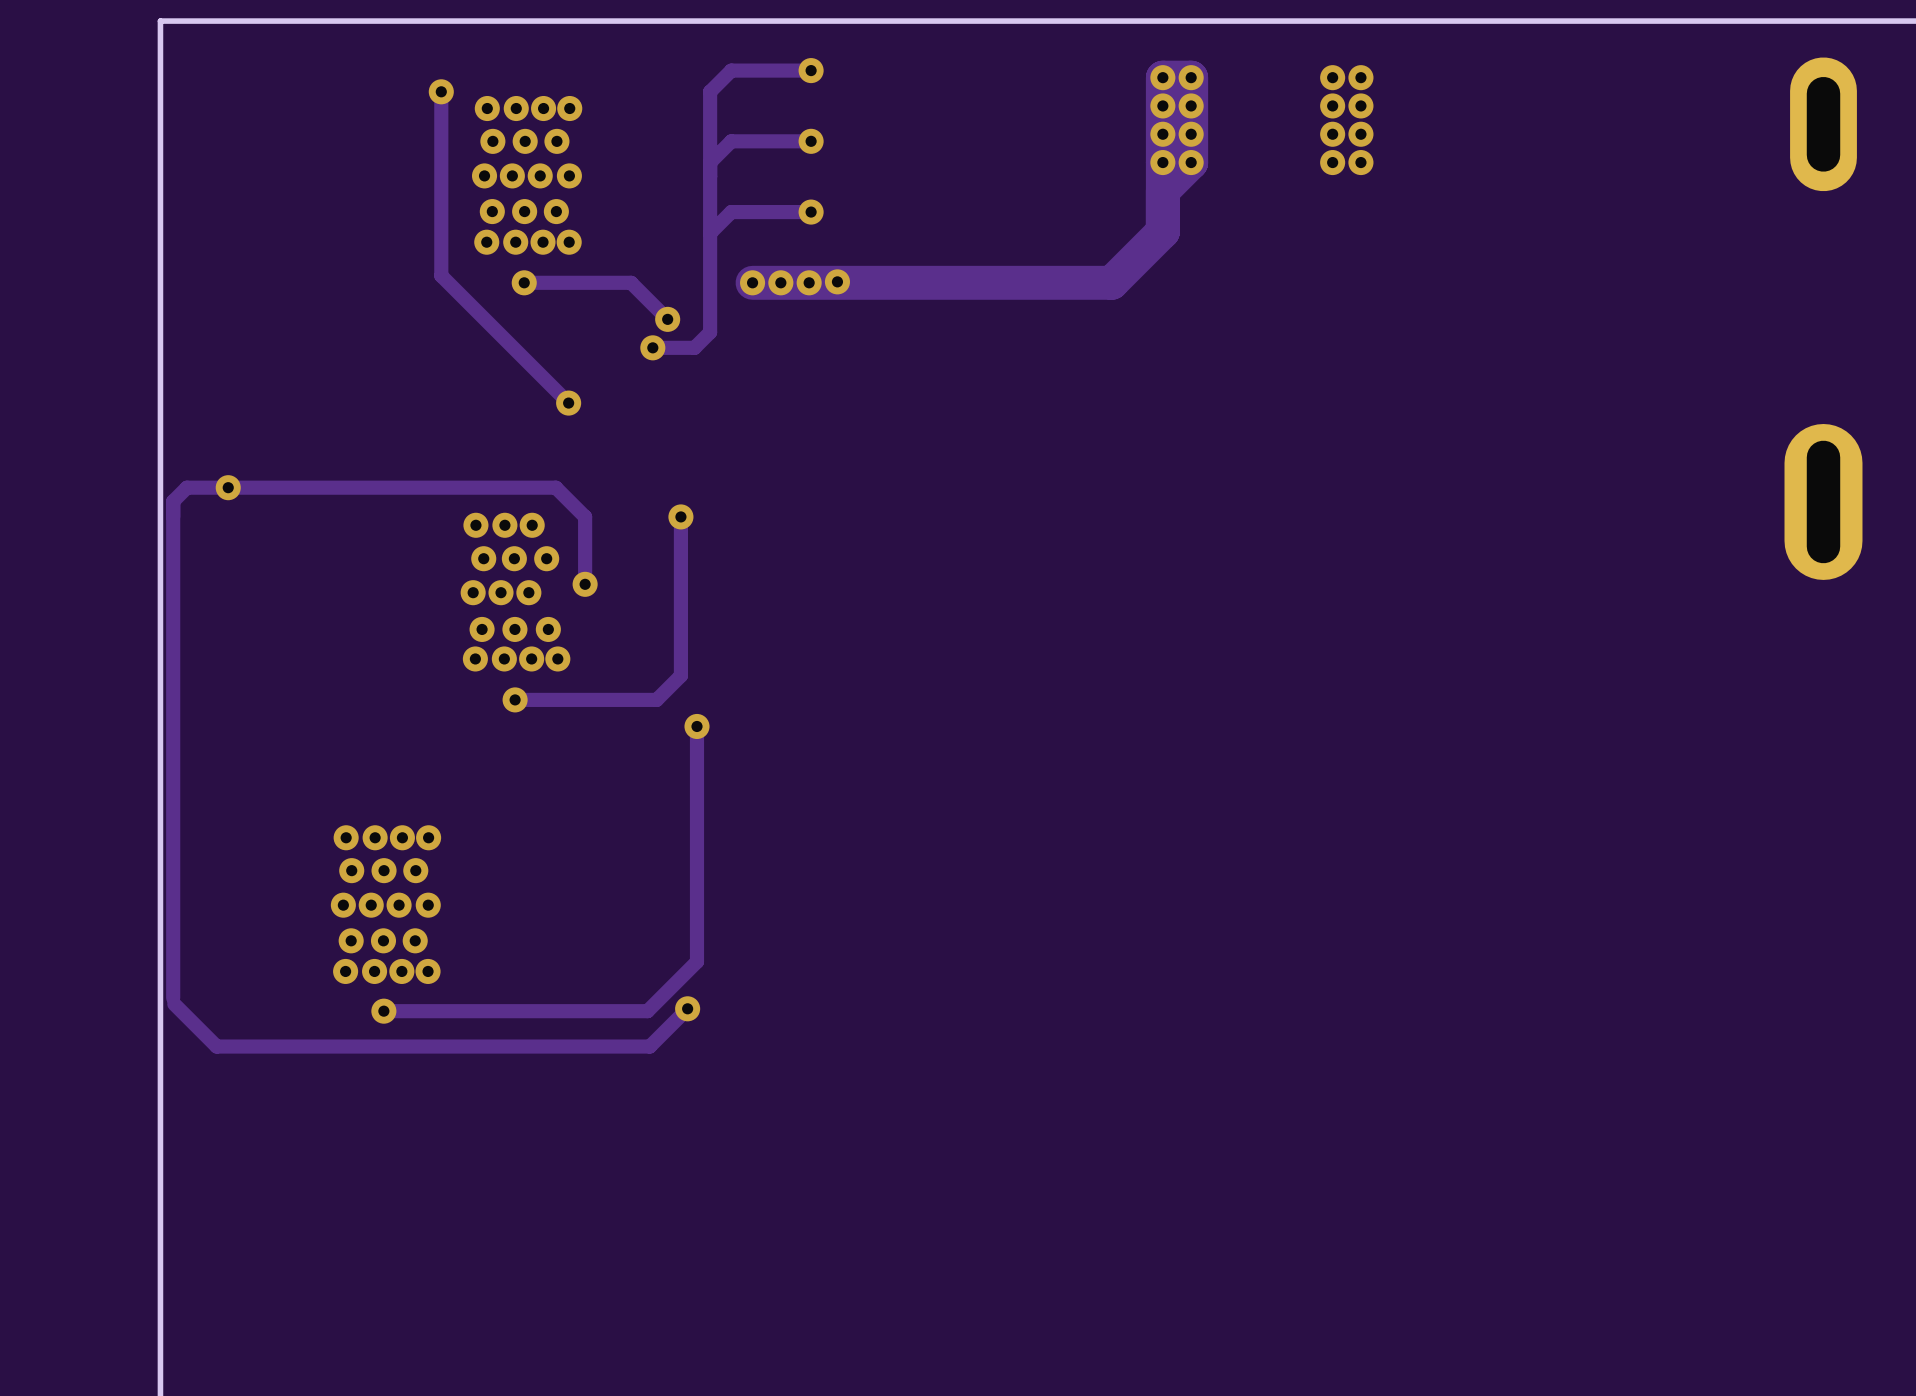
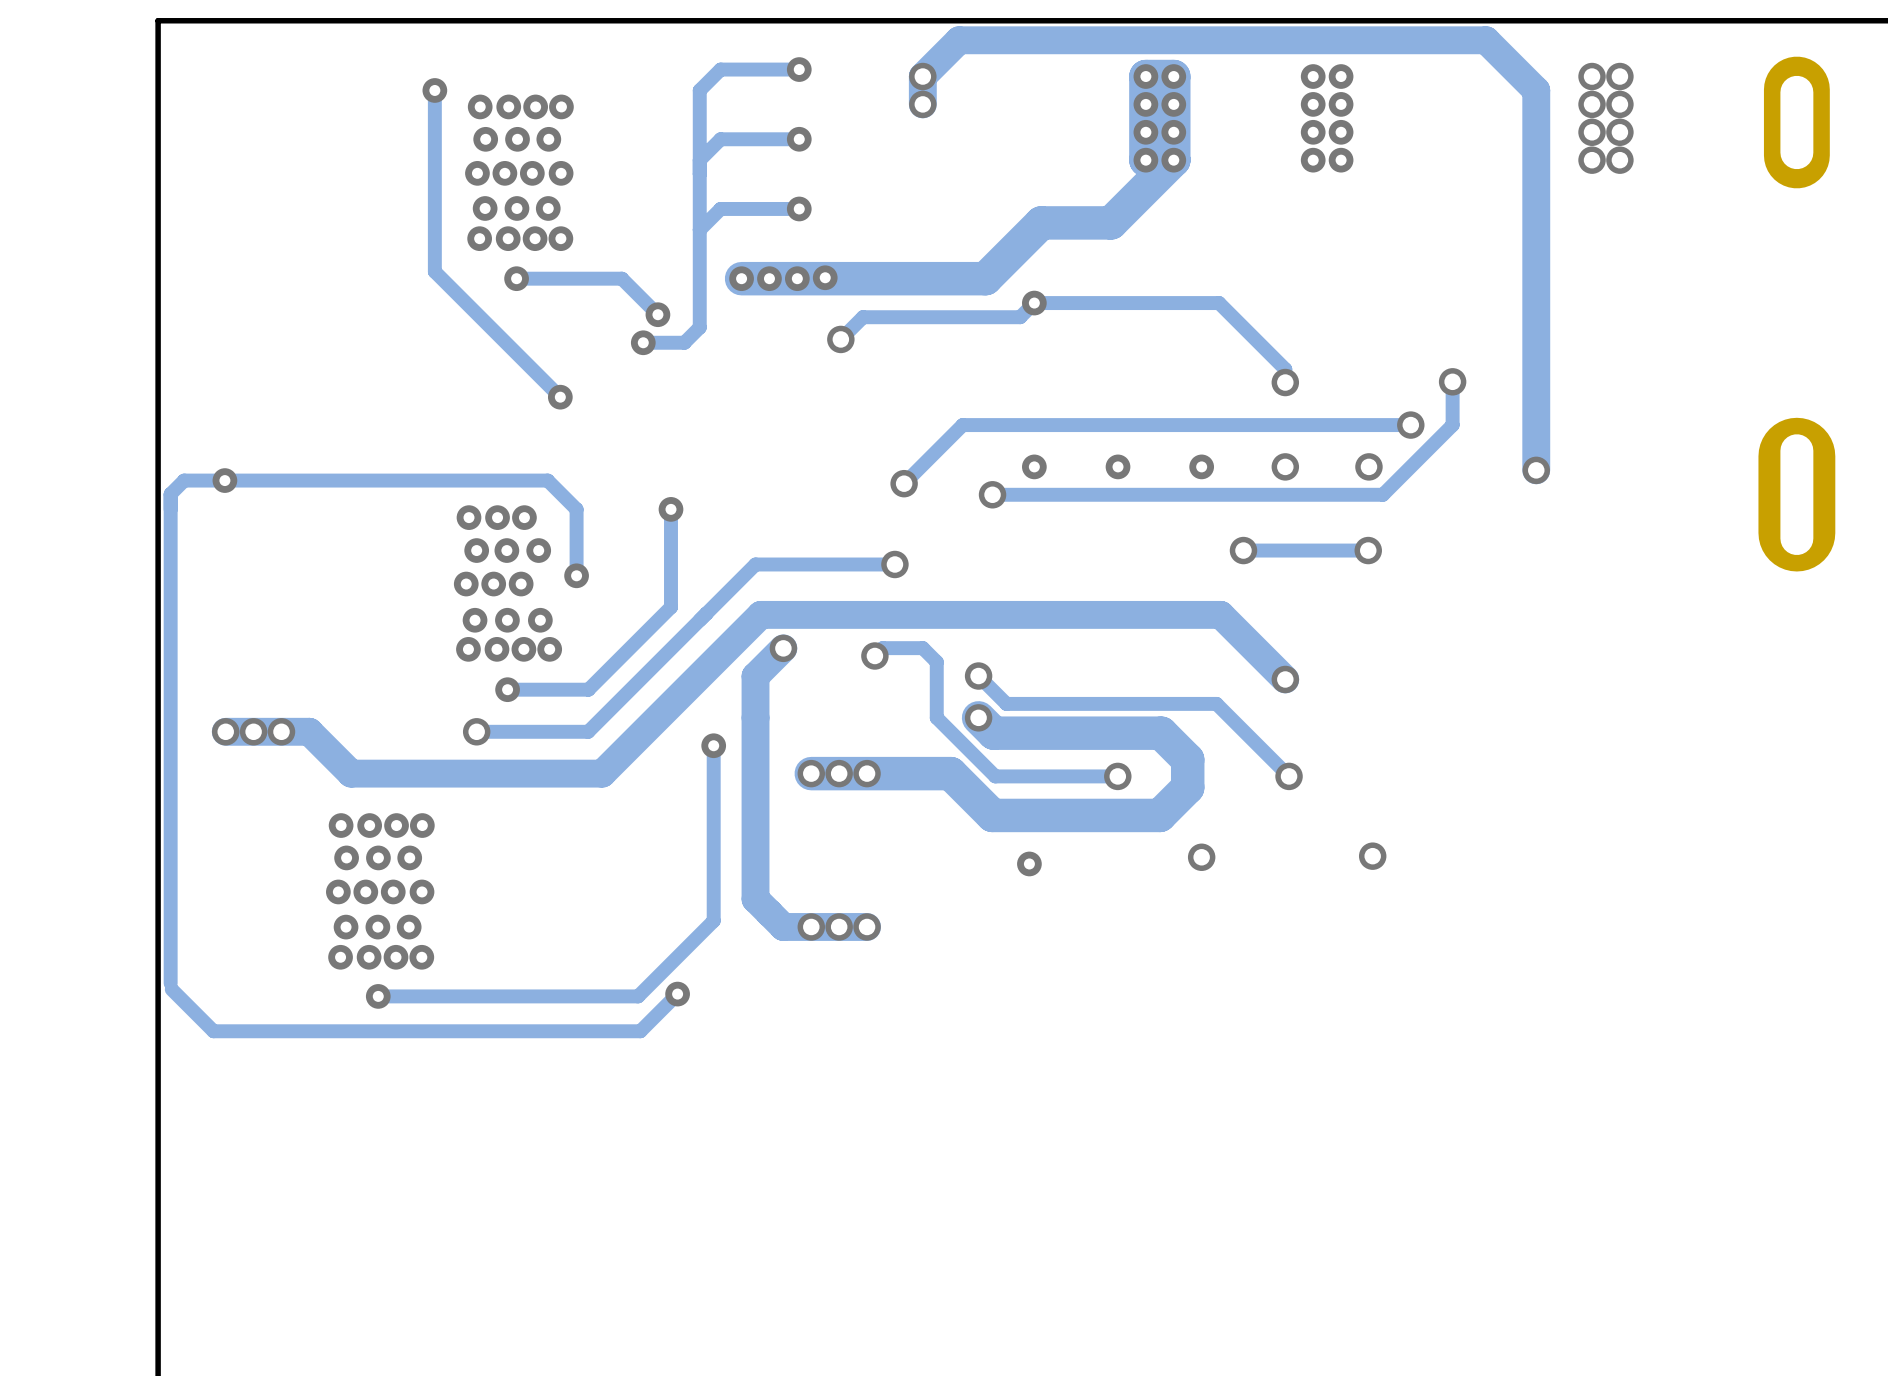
via: none -> (922, 76)
via: none -> (1592, 76)
via: none -> (1619, 76)
track: none -> (922, 104) (922, 76) (959, 40) (1486, 40) (1536, 90) (1536, 470)
via: none -> (922, 104)
via: none -> (1592, 104)
via: none -> (1619, 104)
via: none -> (1592, 132)
via: none -> (1619, 132)
track: (1162, 162) (1162, 231) (1111, 282) (1000, 282) -> (1145, 188) (1111, 222) (1041, 222) (985, 278)
via: none -> (1592, 160)
via: none -> (1619, 160)
via: none -> (1034, 303)
track: none -> (840, 339) (863, 317) (1020, 317) (1034, 303) (1219, 303) (1285, 369) (1285, 382)
via: none -> (840, 339)
track: none -> (1452, 381) (1452, 425) (1382, 494) (992, 494)
via: none -> (1452, 381)
via: none -> (1285, 382)
track: none -> (1410, 425) (962, 425) (904, 483)
via: none -> (1410, 425)
via: none -> (1034, 466)
via: none -> (1118, 466)
via: none -> (1201, 466)
via: none -> (1285, 466)
via: none -> (1368, 466)
via: none -> (1536, 470)
via: none -> (904, 483)
via: none -> (992, 494)
via: none -> (1243, 550)
track: none -> (1368, 550) (1243, 550)
via: none -> (1368, 550)
track: none -> (894, 564) (755, 564) (588, 731) (476, 731)
via: none -> (894, 564)
track: (680, 616) (680, 675) (656, 699) (597, 699) -> (670, 607) (588, 689)
track: none -> (783, 648) (755, 676) (755, 899) (783, 926) (867, 926)
via: none -> (783, 648)
track: none -> (874, 655) (882, 648) (922, 648) (936, 662) (936, 717) (995, 776) (1117, 776)
via: none -> (874, 655)
track: none -> (978, 676) (1006, 703) (1216, 703) (1289, 776)
via: none -> (978, 676)
track: none -> (1285, 679) (1220, 614) (760, 614) (602, 773) (351, 773) (309, 731) (225, 731)
via: none -> (1285, 679)
track: (697, 726) (697, 961) -> (713, 745) (713, 920) (686, 947)
via position: (697, 726) -> (713, 745)
track: none -> (978, 717) (993, 733) (1161, 733) (1187, 759) (1187, 787) (1159, 815) (992, 815) (950, 773) (811, 773)
via: none -> (978, 717)
via: none -> (225, 731)
via: none -> (253, 731)
via: none -> (281, 731)
via: none -> (476, 731)
via: none -> (811, 773)
via: none -> (839, 773)
via: none -> (867, 773)
via: none -> (1117, 776)
via: none -> (1289, 776)
via: none -> (1372, 856)
via: none -> (1201, 857)
via: none -> (1029, 863)
via: none -> (811, 926)
via: none -> (839, 926)
via: none -> (867, 926)

